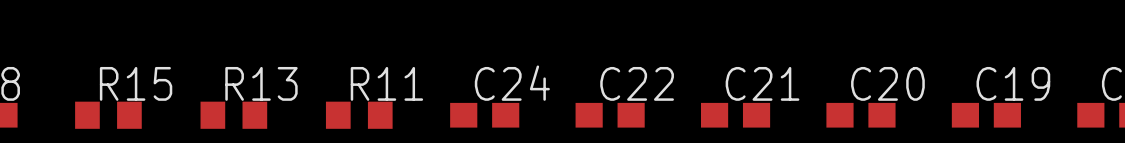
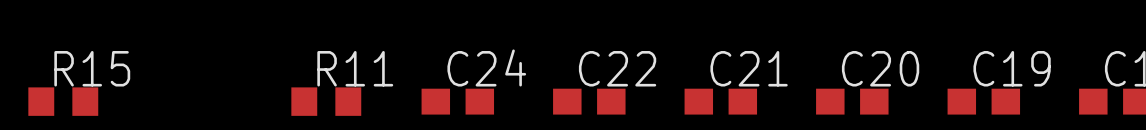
R13: (233, 115) -> none

